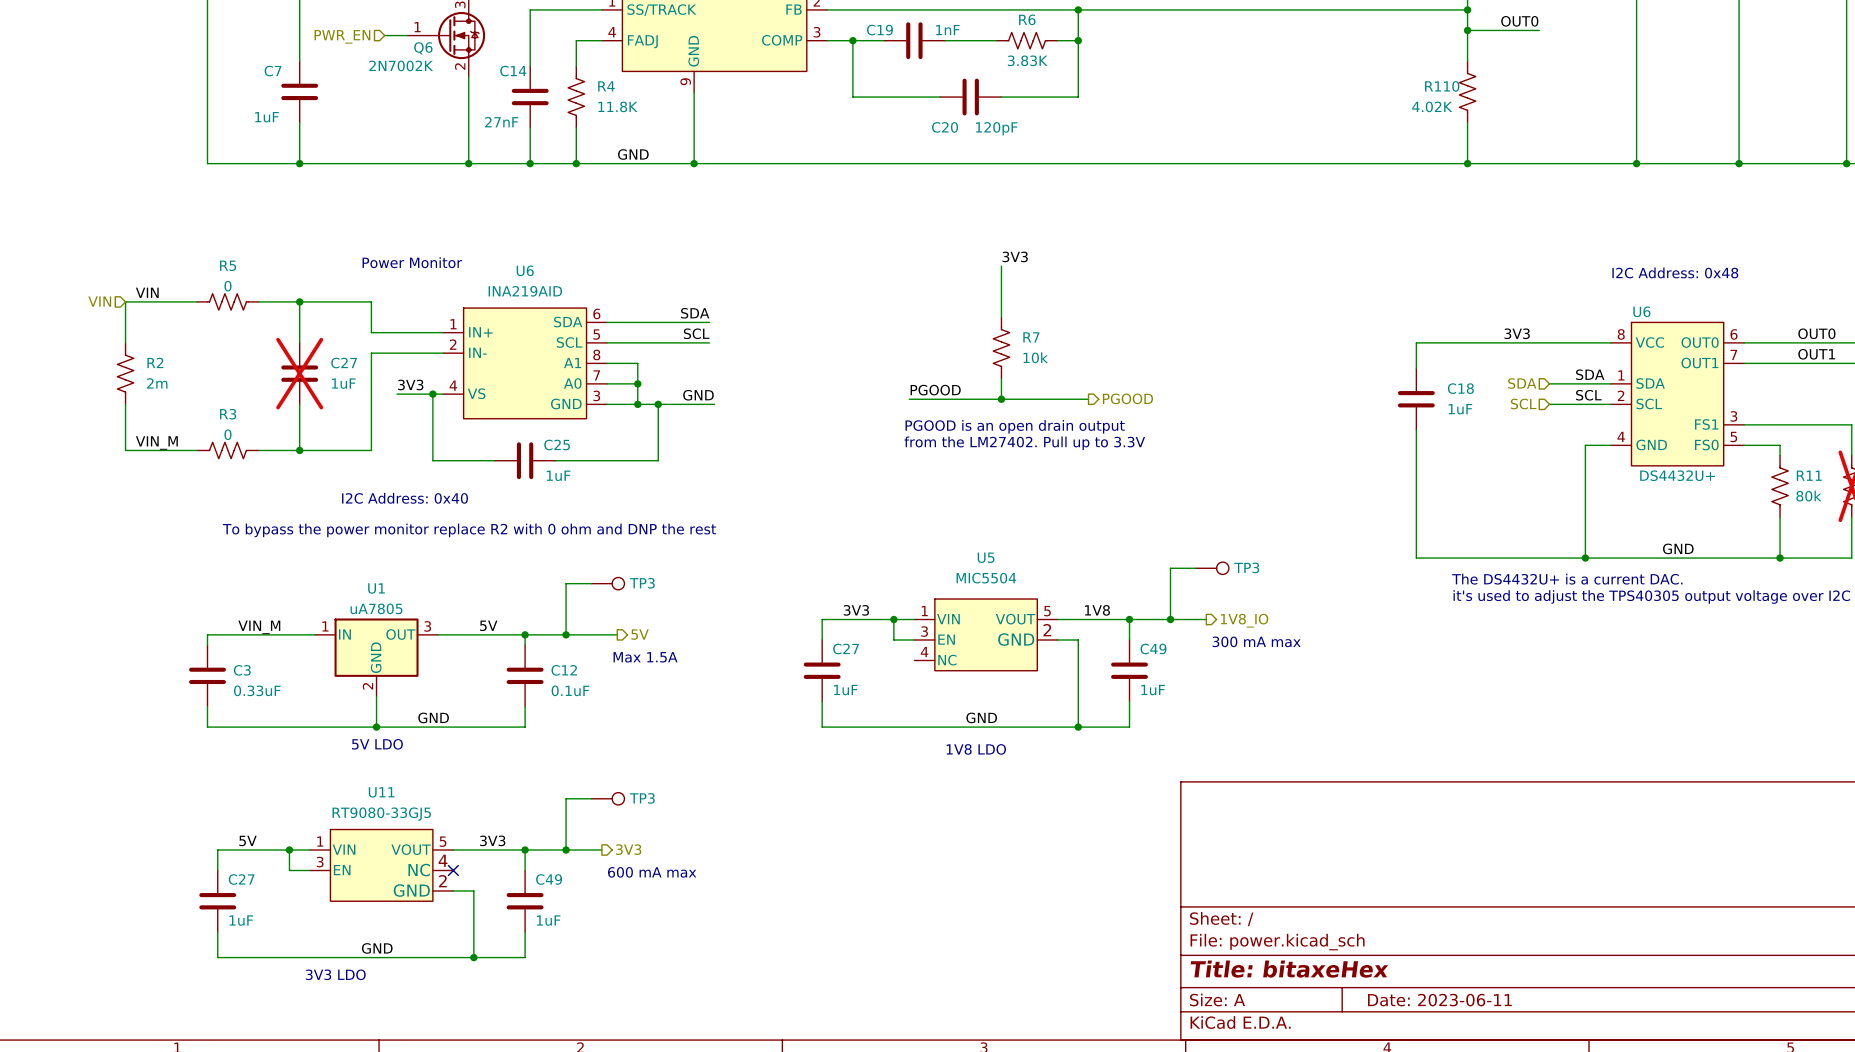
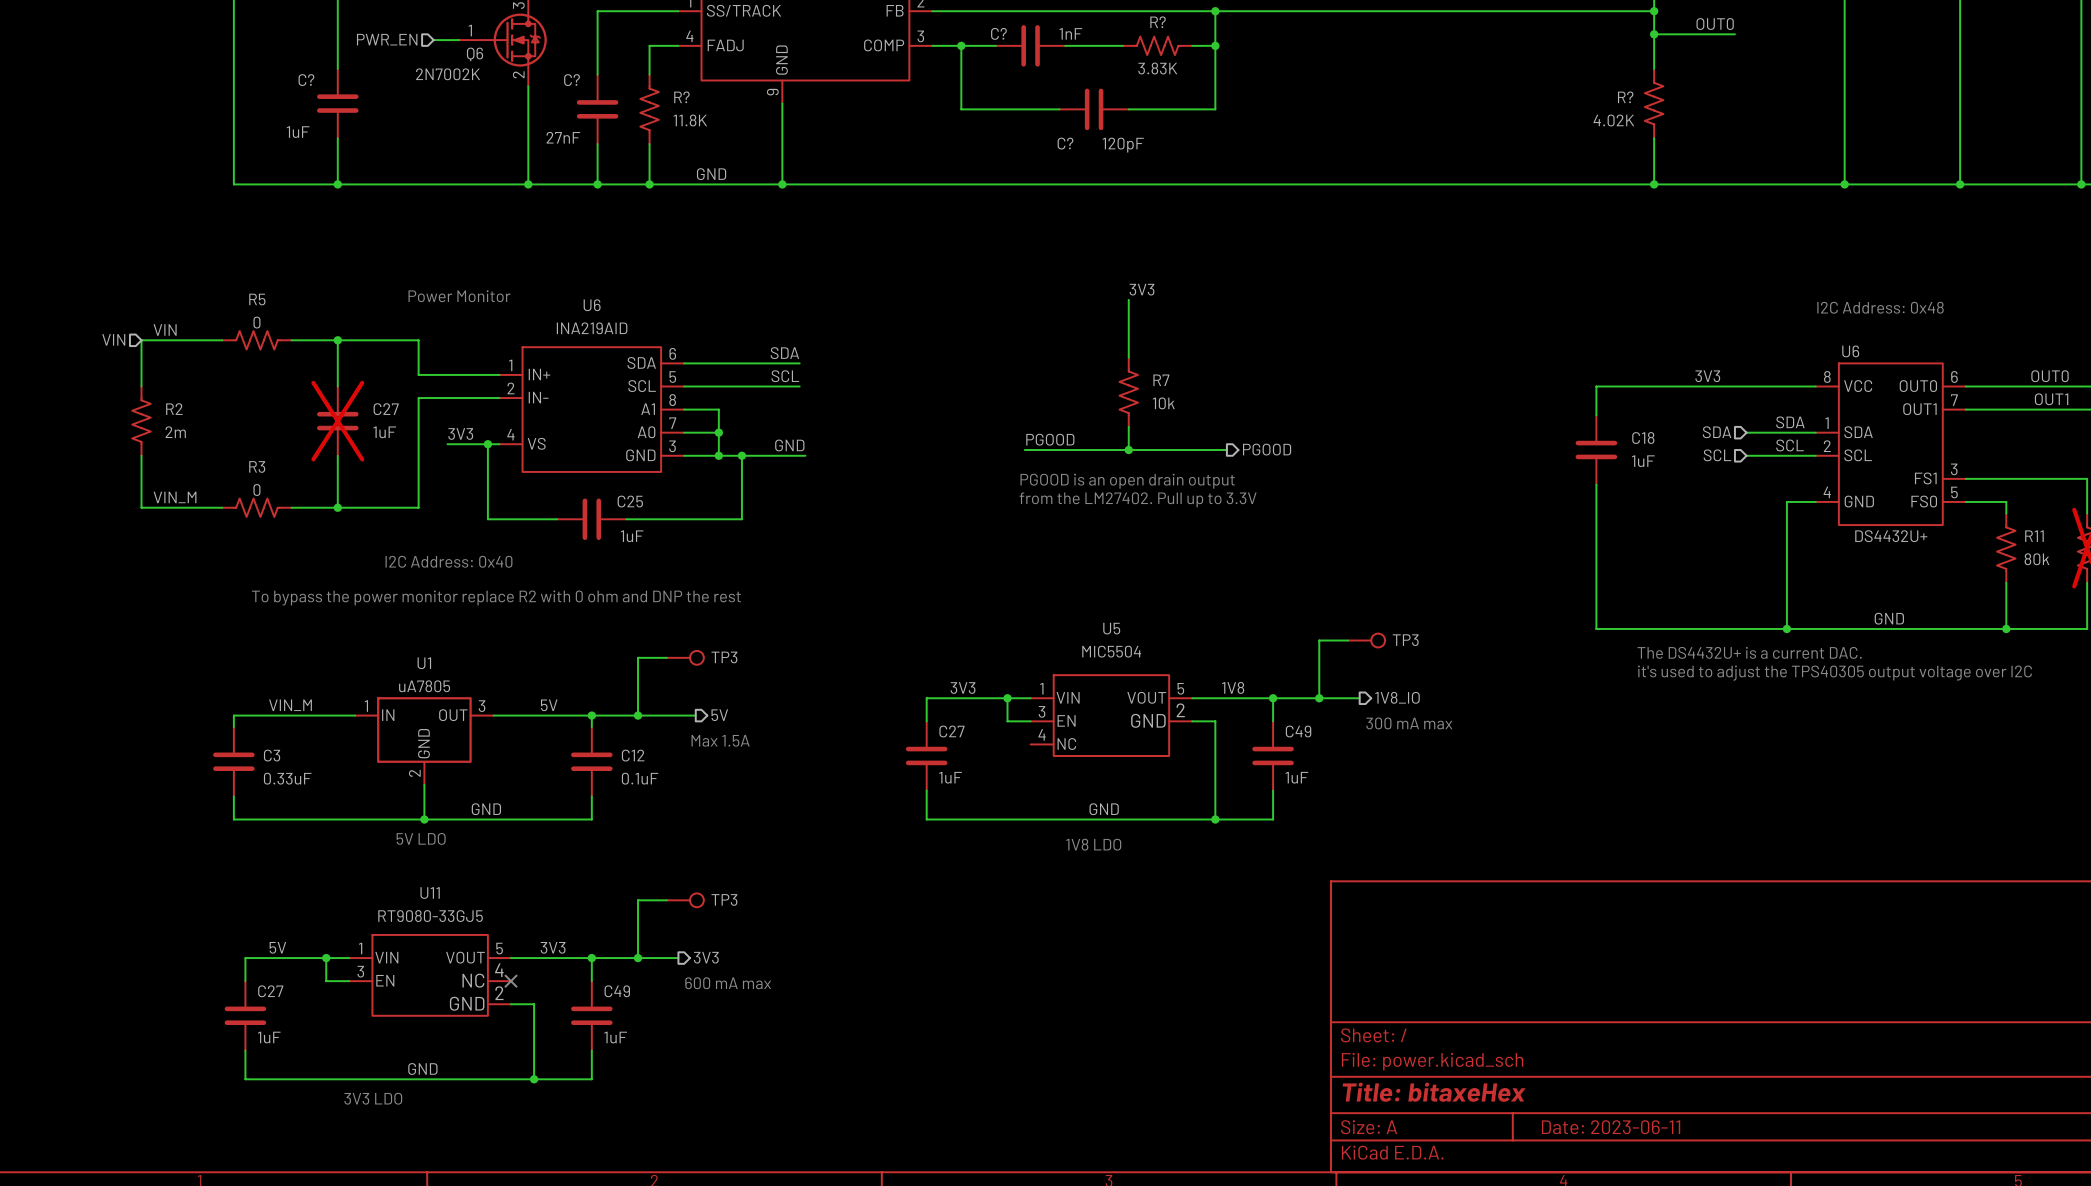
R6 name: R6 (1027, 19) -> R? (1158, 22)
C19 name: C19 (879, 30) -> C? (998, 33)
C7 name: C7 (273, 71) -> C? (306, 80)
C14 name: C14 (513, 71) -> C? (572, 80)
R4 name: R4 (606, 86) -> R? (681, 97)
R110 name: R110 (1442, 86) -> R? (1625, 97)
C20 name: C20 (945, 127) -> C? (1065, 143)

